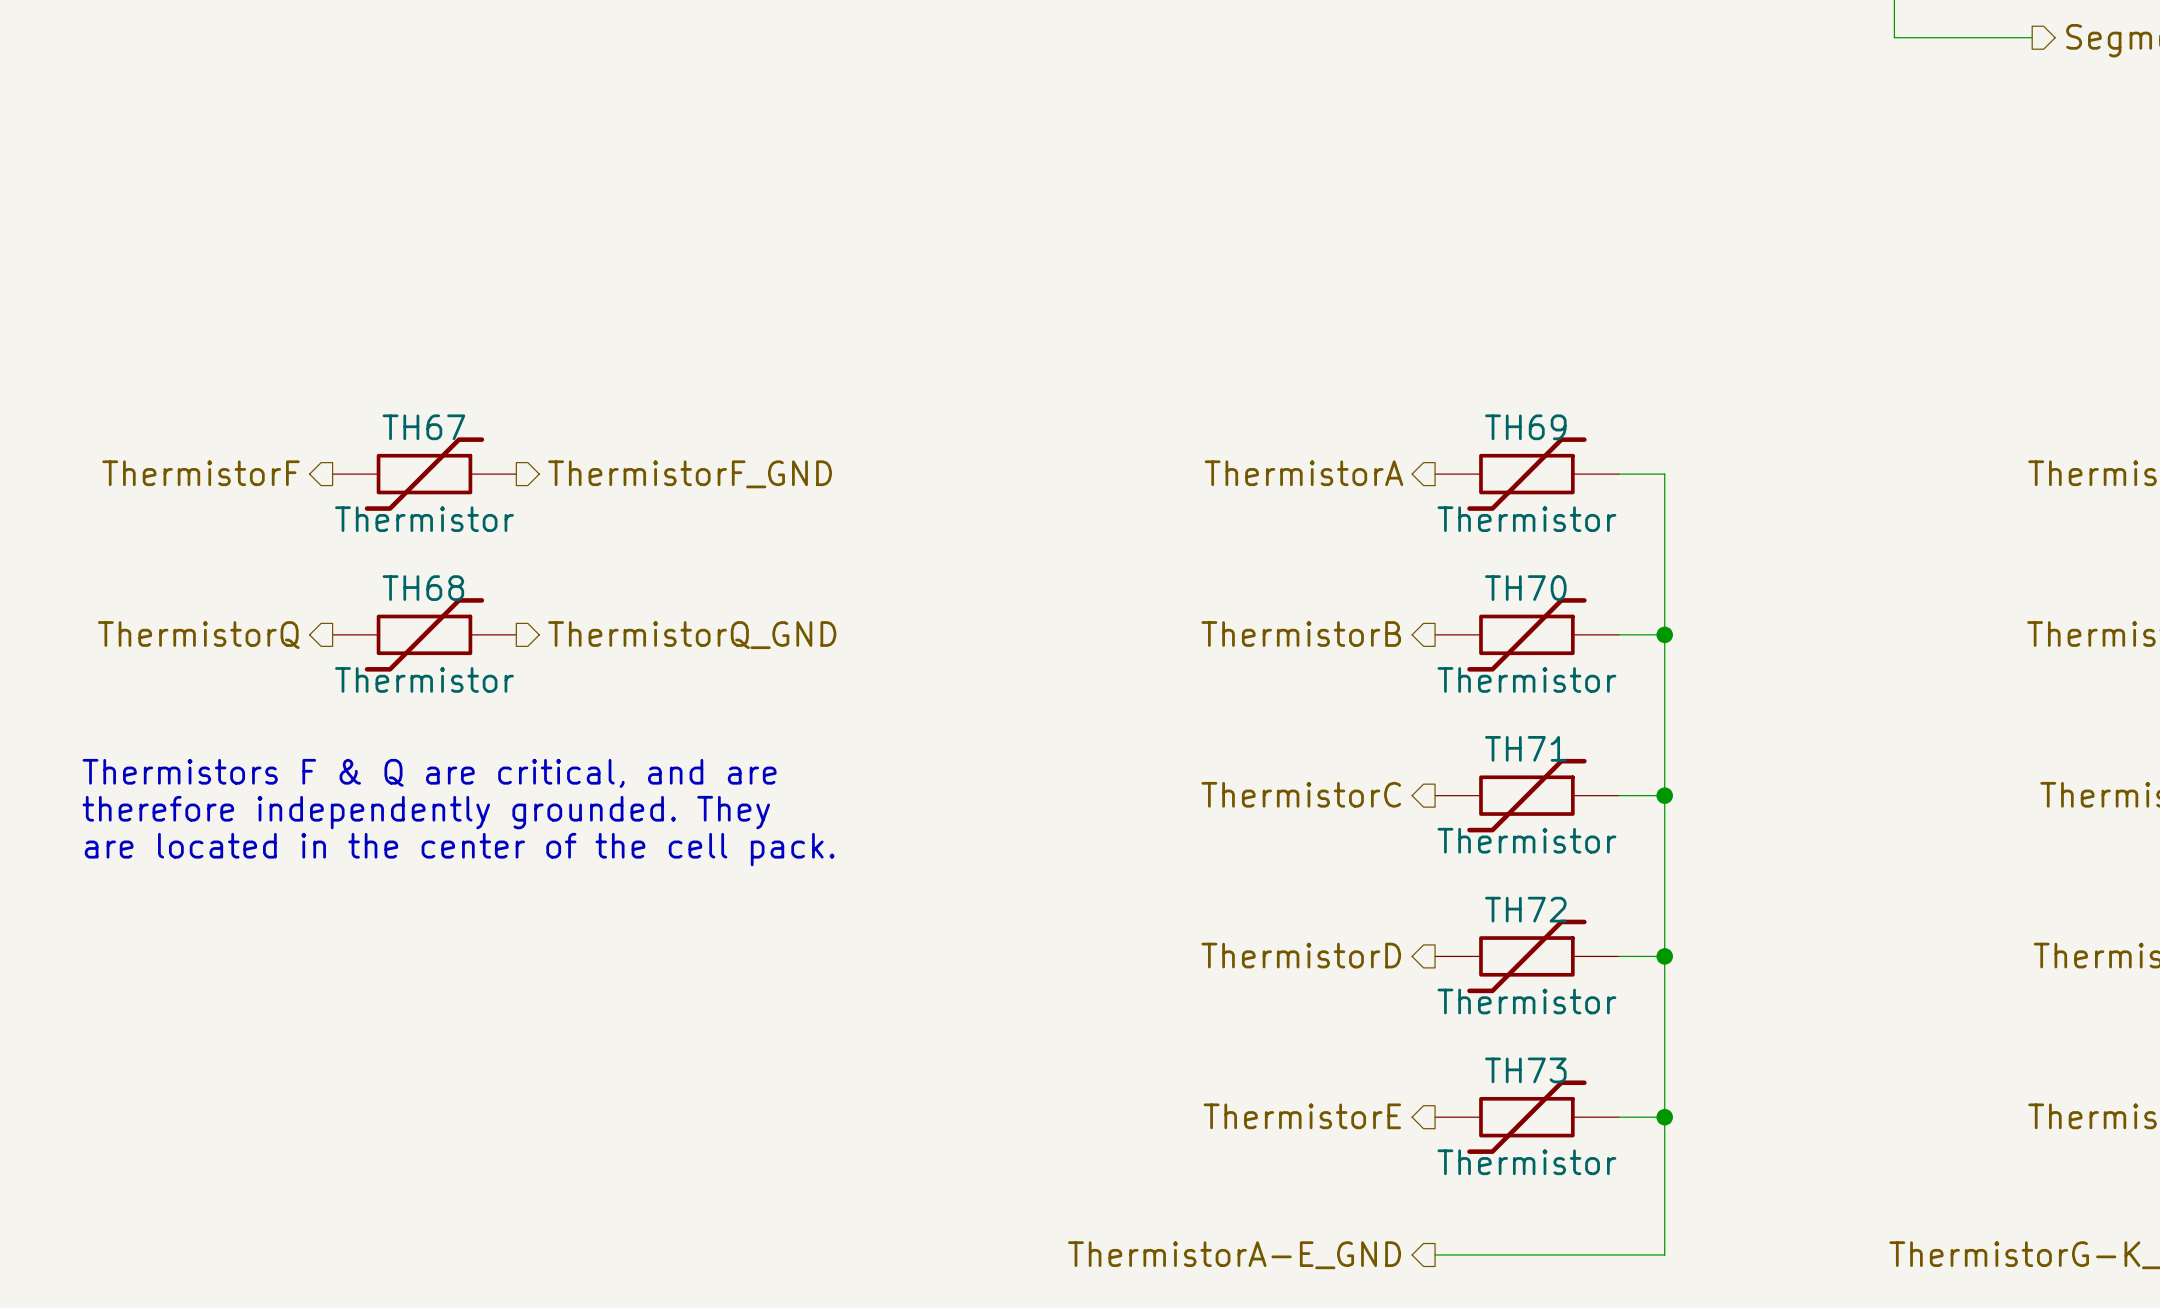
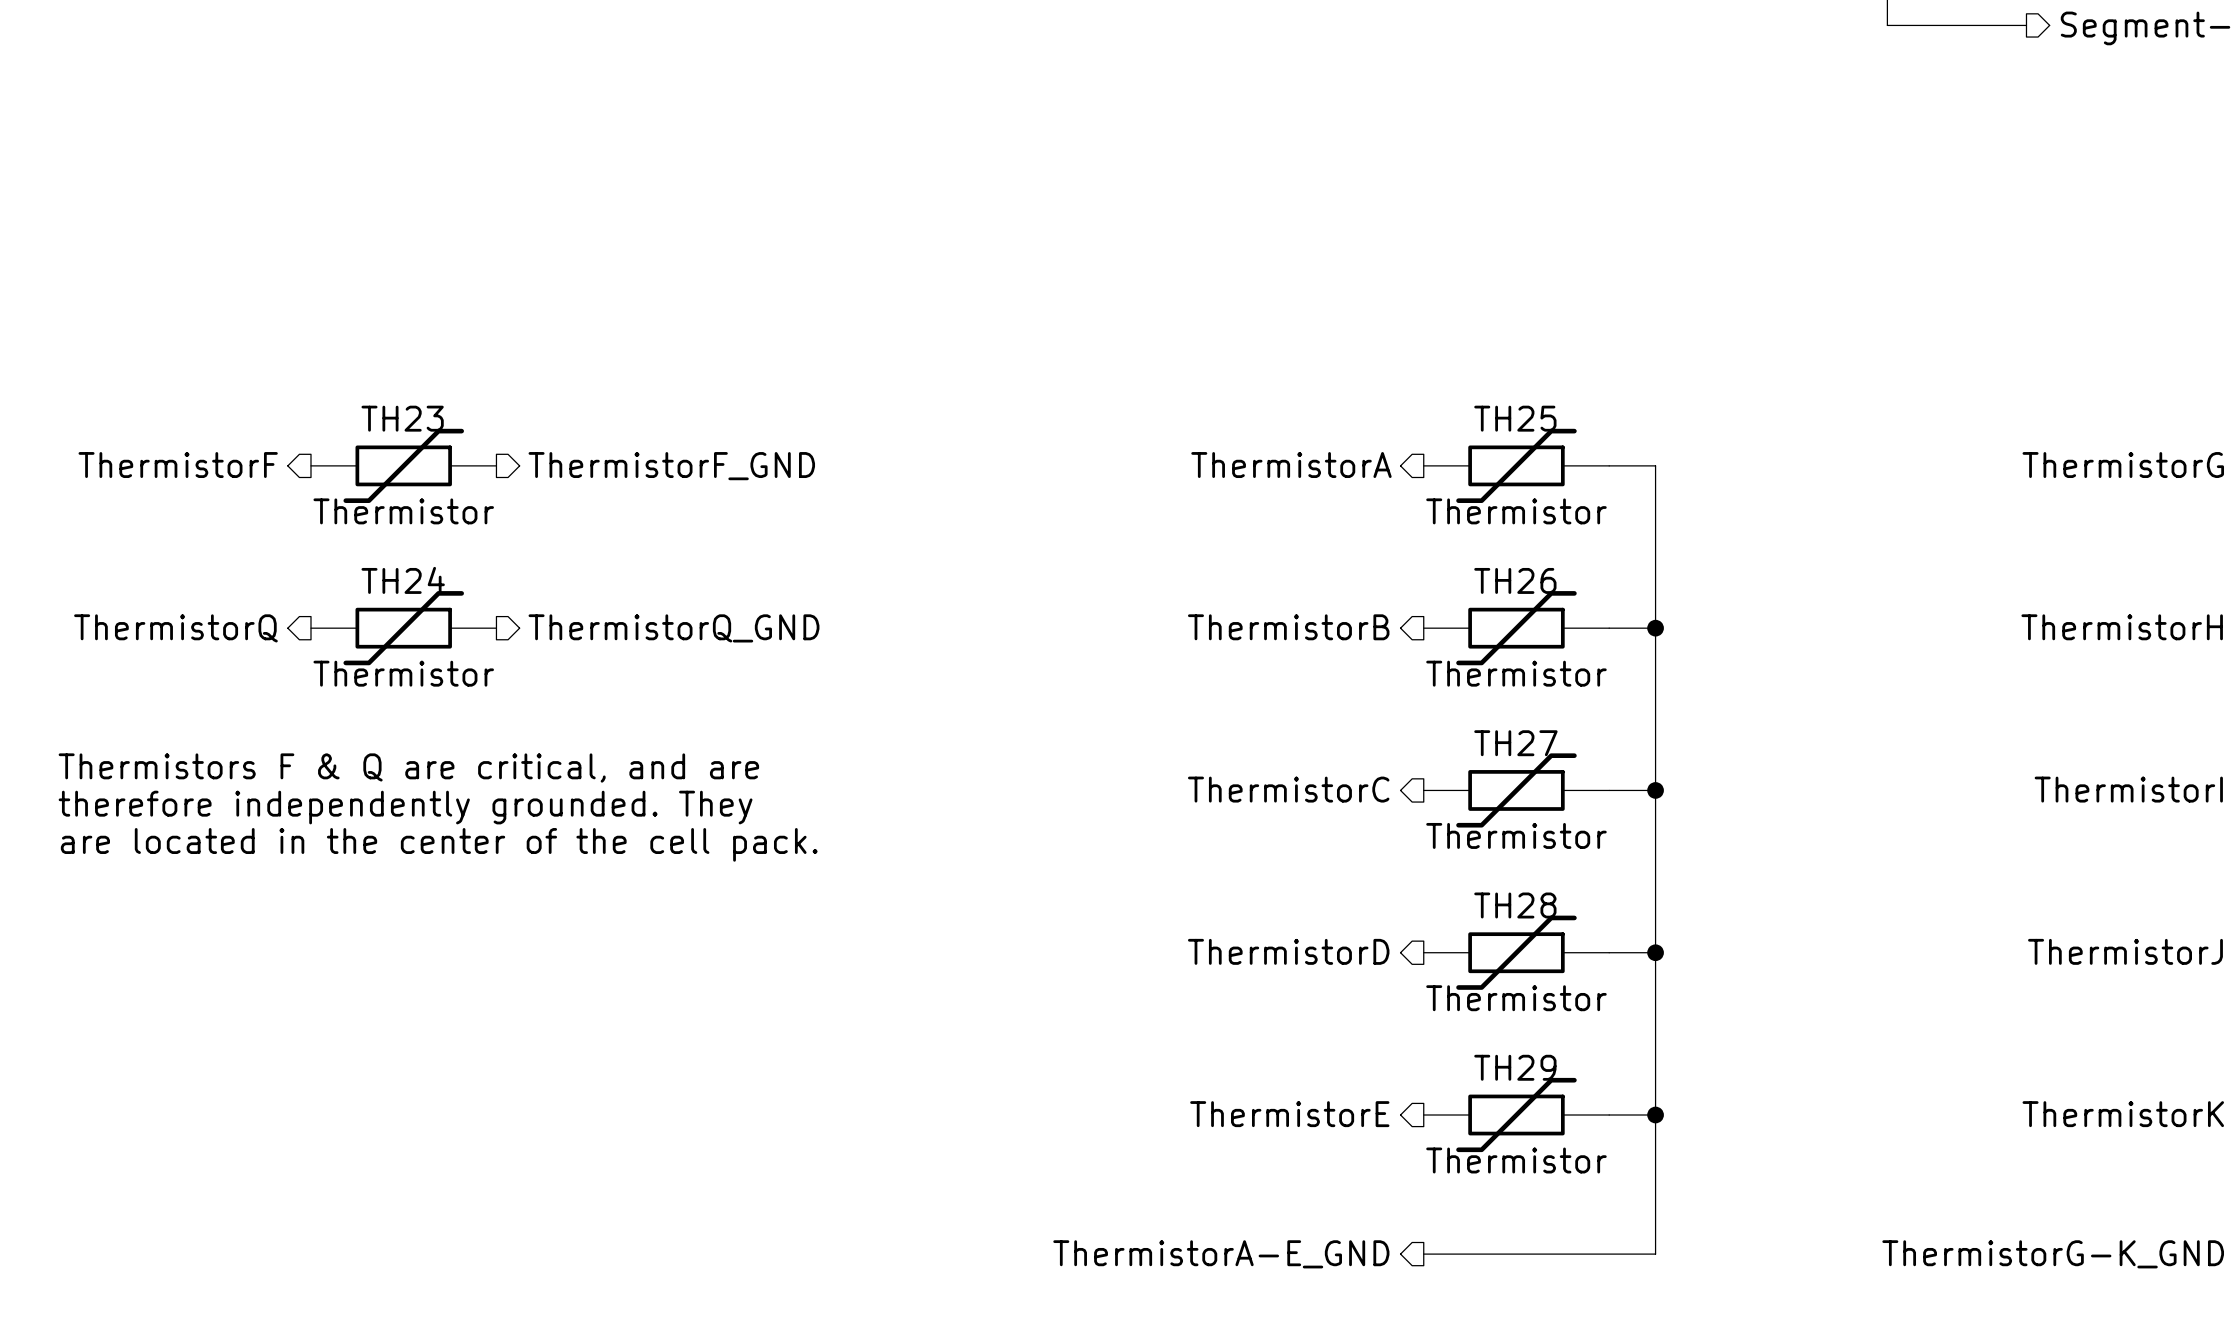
TH67 name: TH67 (423, 427) -> TH23 (402, 418)
TH69 name: TH69 (1525, 427) -> TH25 (1515, 418)
TH68 name: TH68 (423, 588) -> TH24 (403, 580)
TH70 name: TH70 (1525, 588) -> TH26 (1515, 580)
TH71 name: TH71 (1525, 748) -> TH27 (1515, 743)
TH72 name: TH72 (1525, 909) -> TH28 (1515, 905)
TH73 name: TH73 (1525, 1070) -> TH29 (1515, 1067)

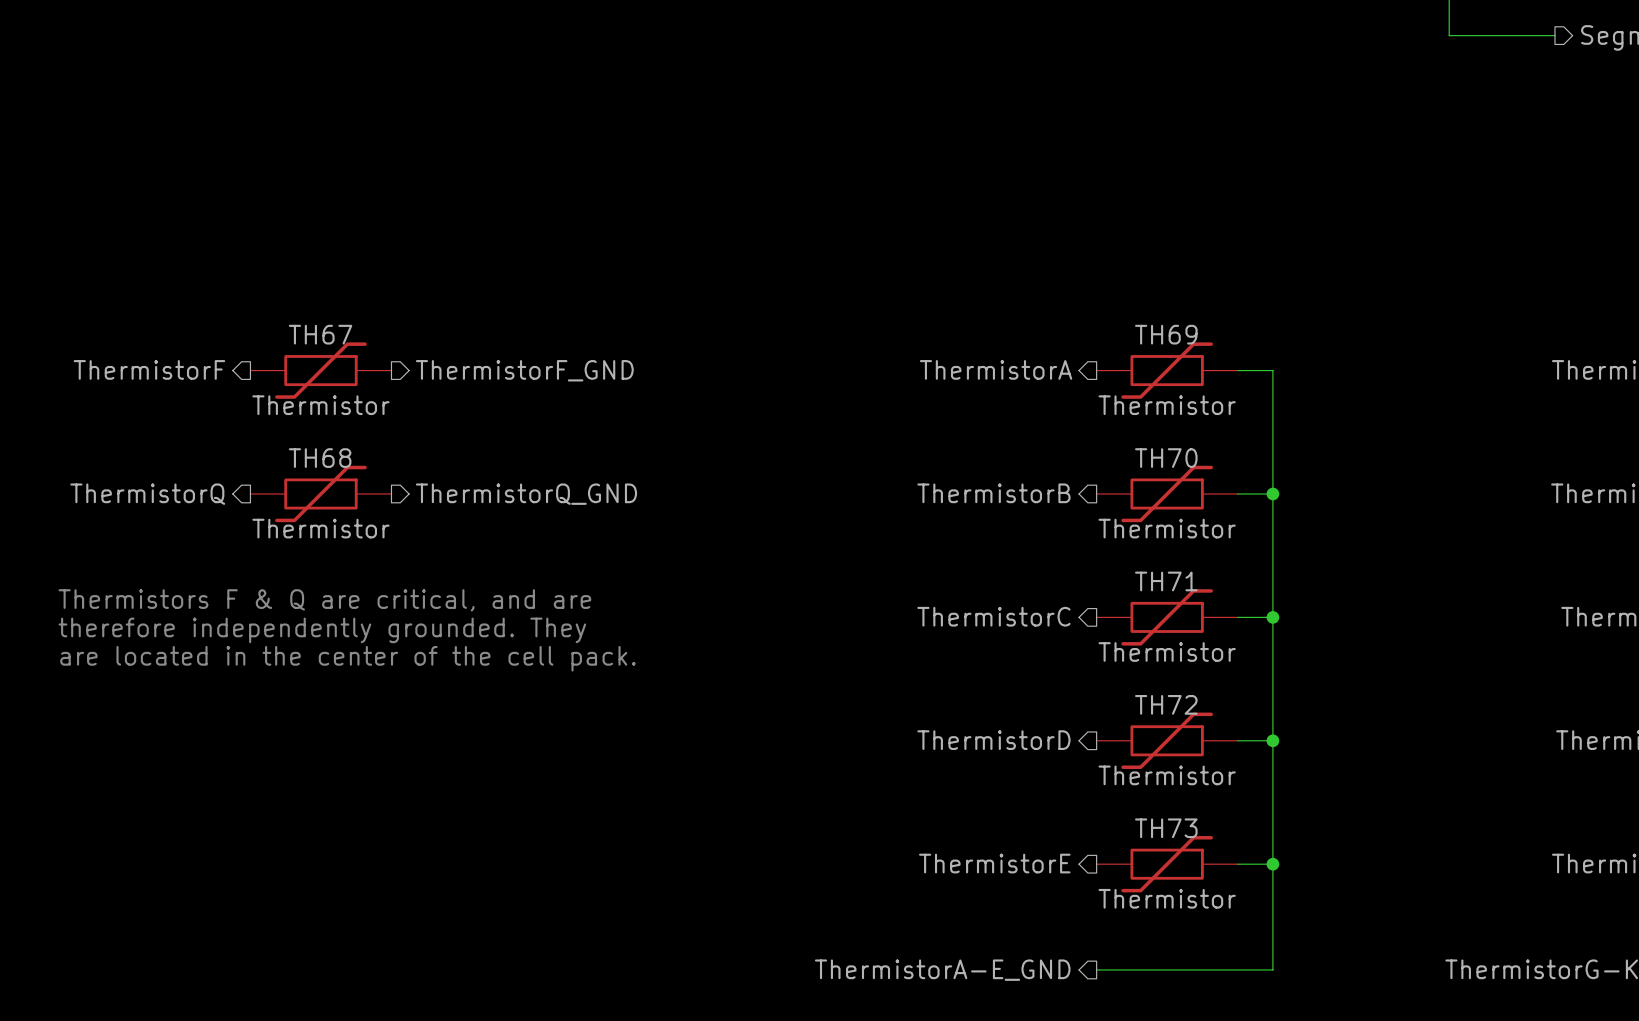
TH23 name: TH23 (402, 418) -> TH67 (320, 334)
TH25 name: TH25 (1515, 418) -> TH69 (1166, 334)
TH24 name: TH24 (403, 580) -> TH68 (320, 458)
TH26 name: TH26 (1515, 580) -> TH70 (1166, 458)
TH27 name: TH27 (1515, 743) -> TH71 (1166, 581)
TH28 name: TH28 (1515, 905) -> TH72 (1166, 704)
TH29 name: TH29 (1515, 1067) -> TH73 (1166, 828)

